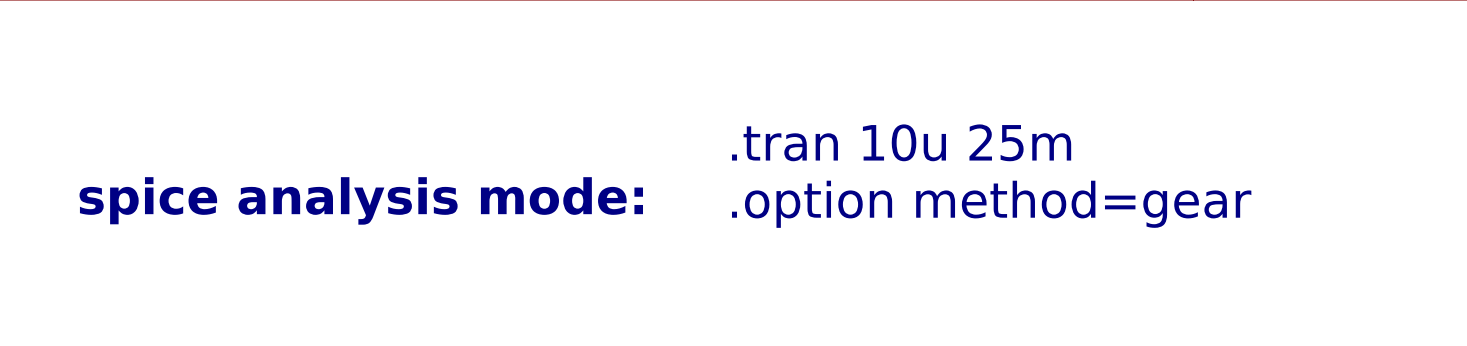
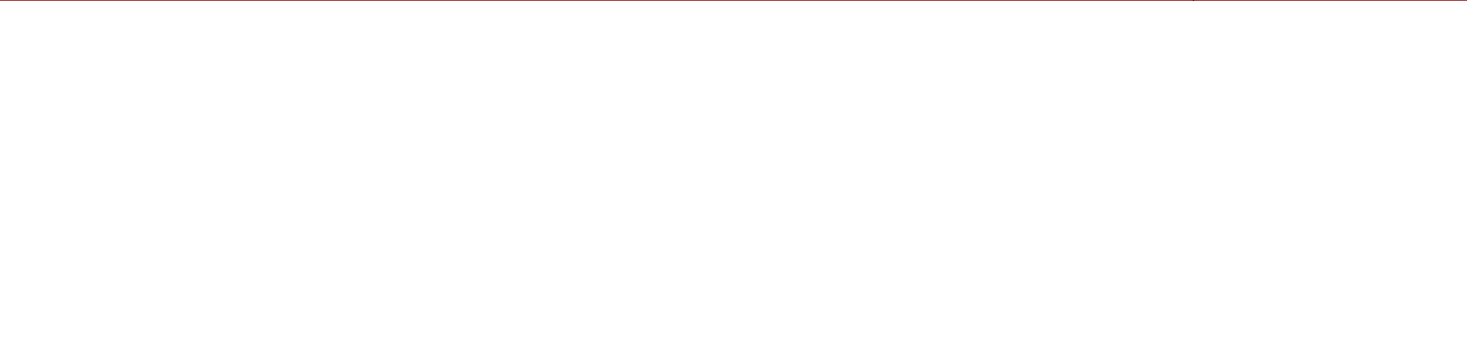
text: .tran 10u 25m (901, 142) -> none
text: spice analysis mode: (361, 200) -> none
text: .option method=gear (991, 204) -> none

